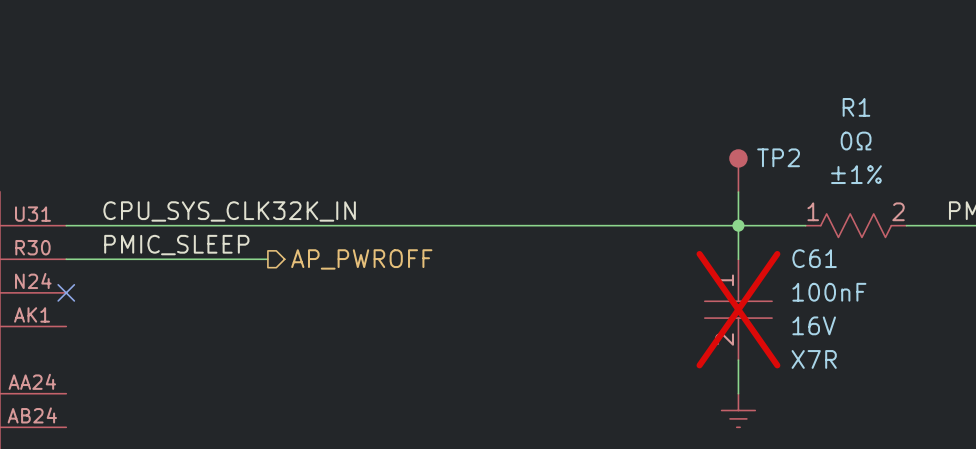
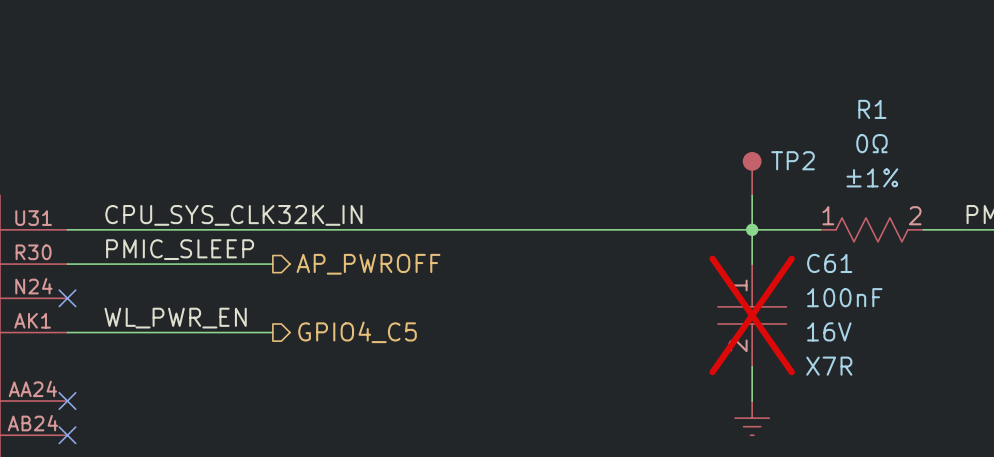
label: none -> WL_PWR_EN (175, 318)
wire: none -> (67, 332) (272, 332)
hierarchical label: none -> GPIO4_C5 (357, 332)
no-connect mark: none -> (67, 401)
no-connect mark: none -> (67, 435)

